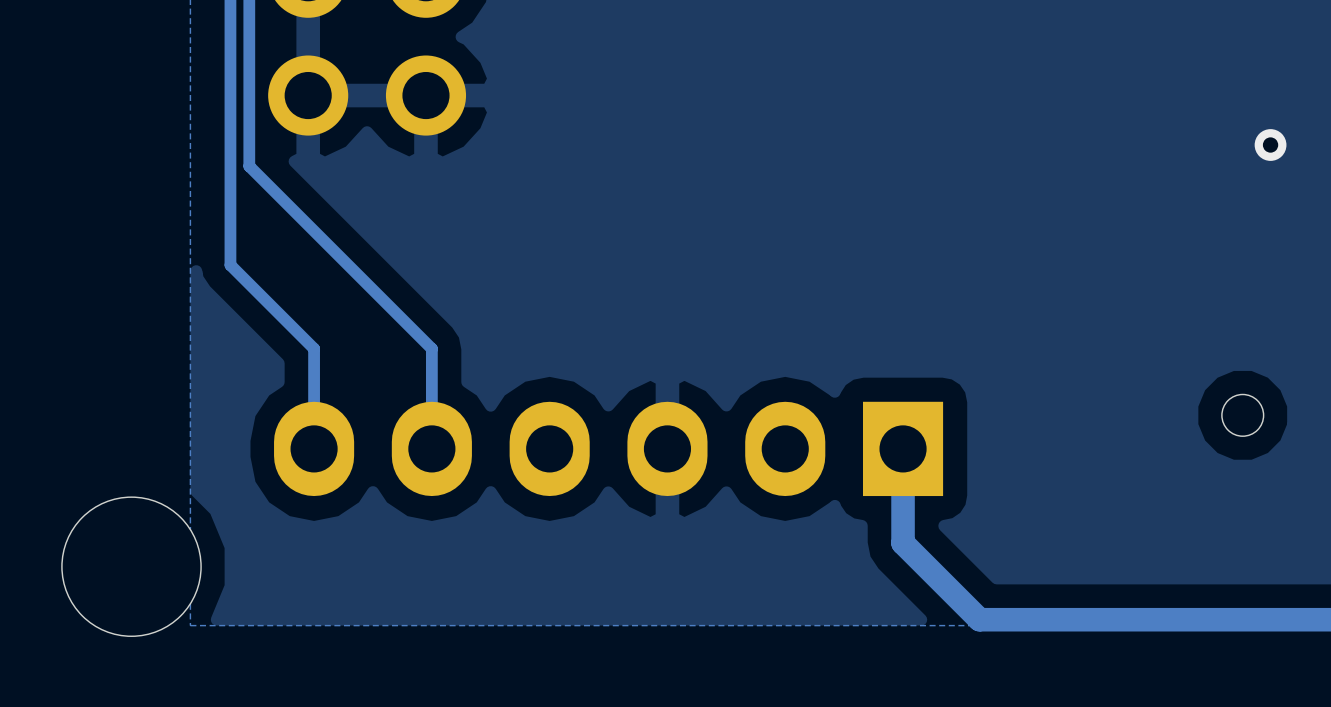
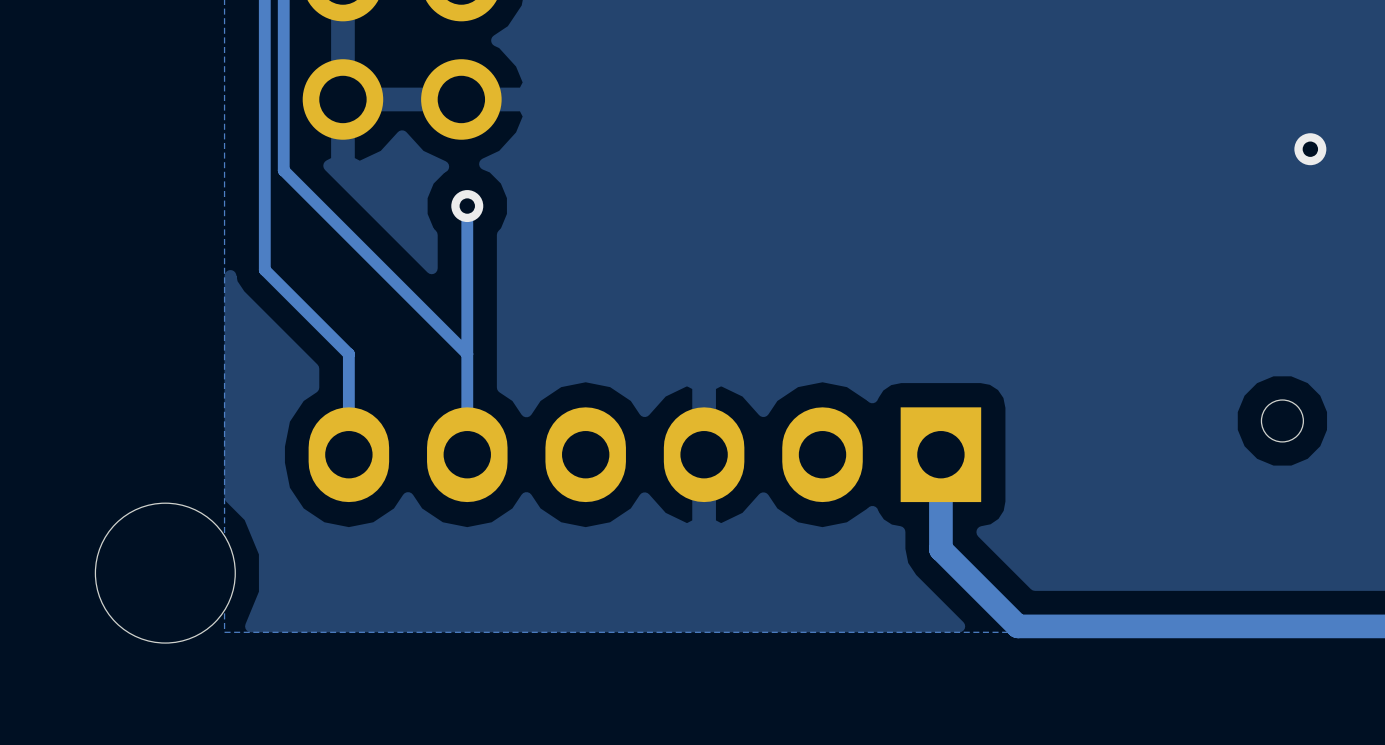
track: none -> (467, 206) (467, 354)
via: none -> (467, 206)

